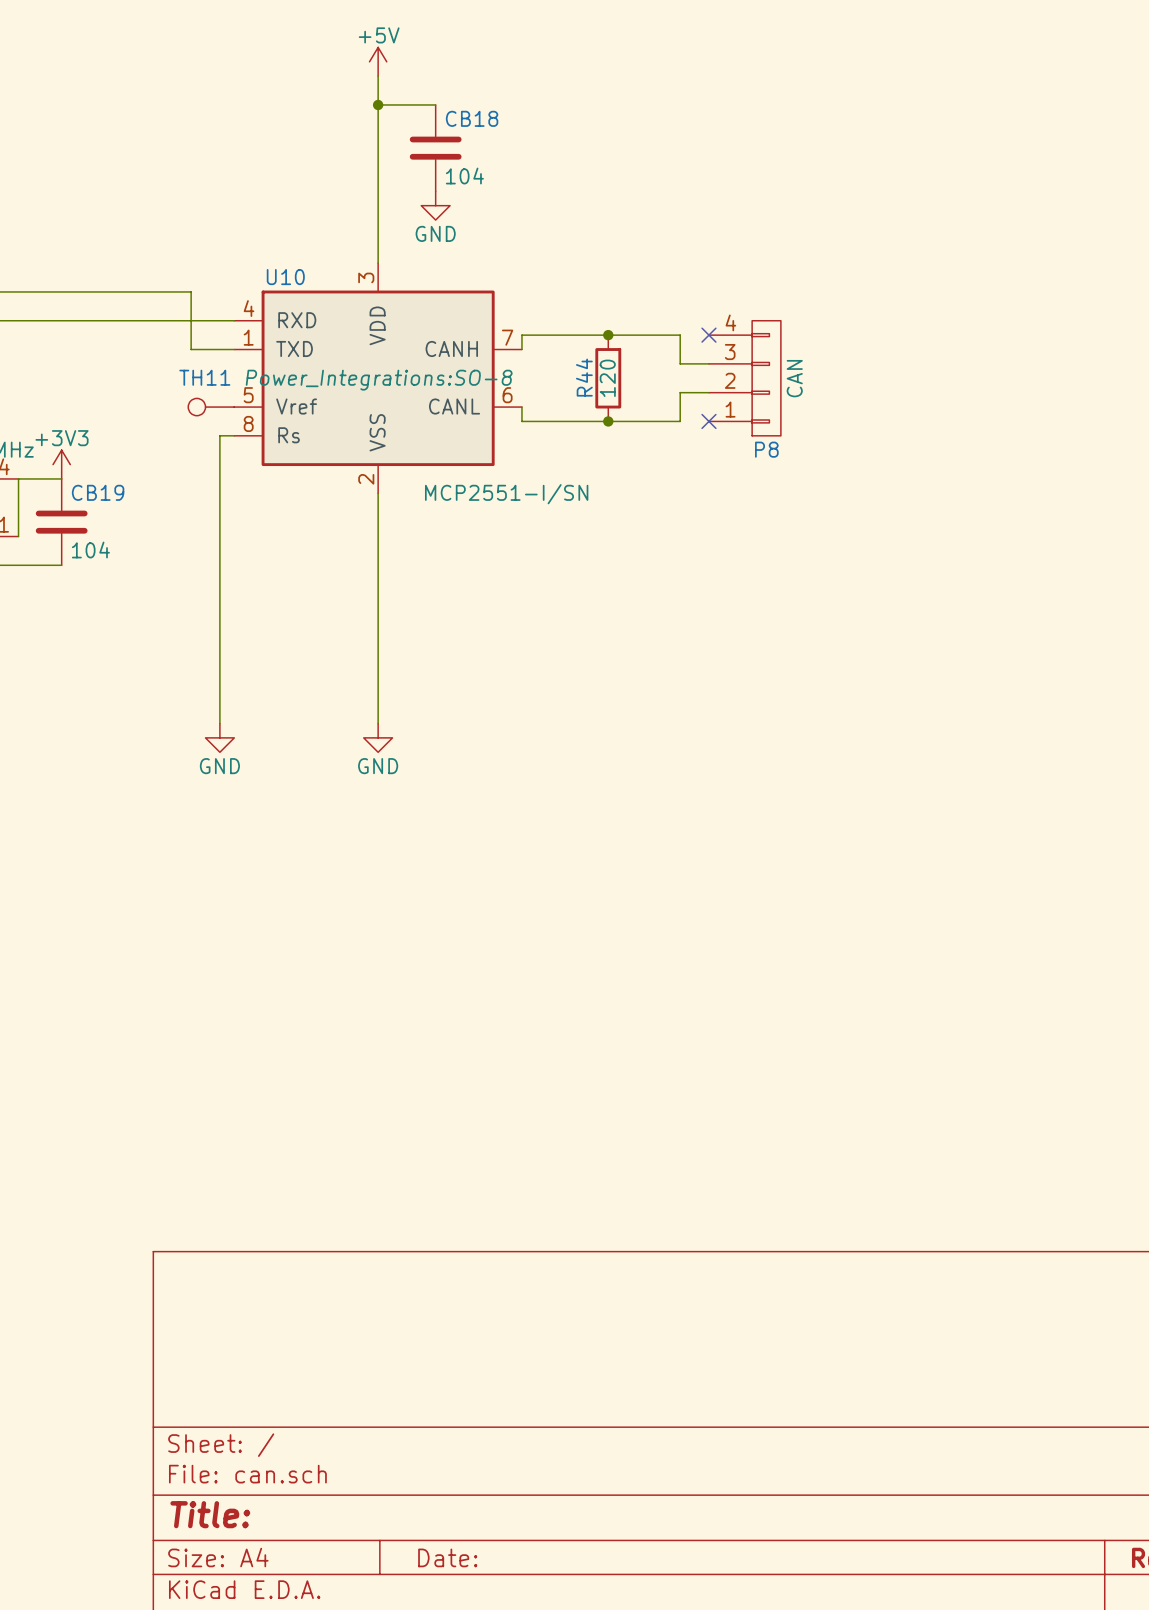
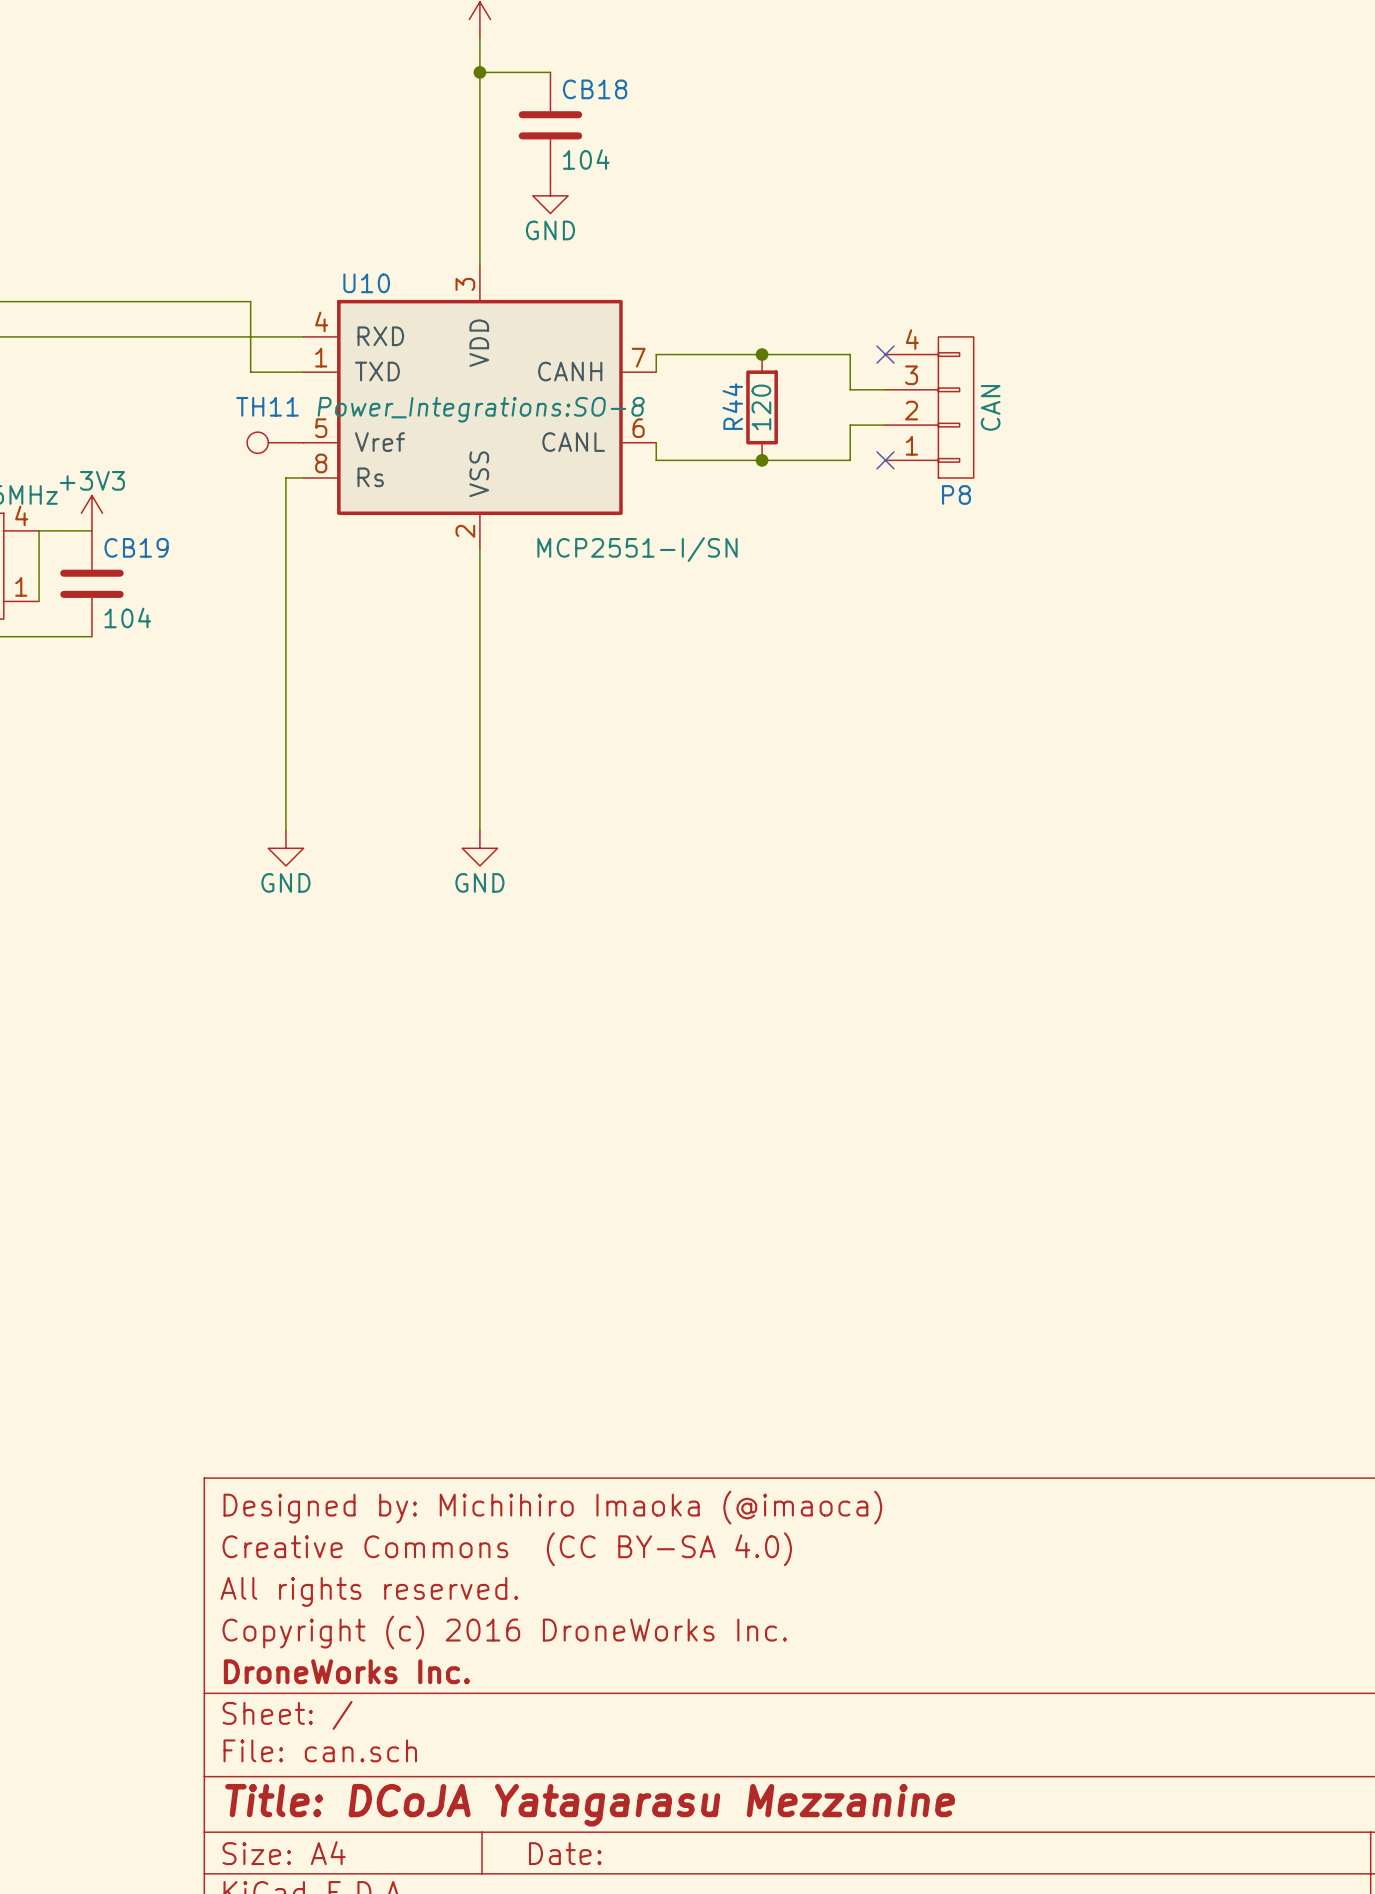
title block: none -> Designed by: Michihiro Imaoka (@imaoca) (552, 1507)
title block: none -> Creative Commons (CC BY-SA 4.0) (507, 1549)
title block: none -> All rights reserved. (369, 1591)
title block: none -> Copyright (c) 2016 DroneWorks Inc. (504, 1632)
title block: none -> DroneWorks Inc. (346, 1671)
title block: Title: (210, 1514) -> Title: DCoJA Yatagarasu Mezzanine (590, 1805)

